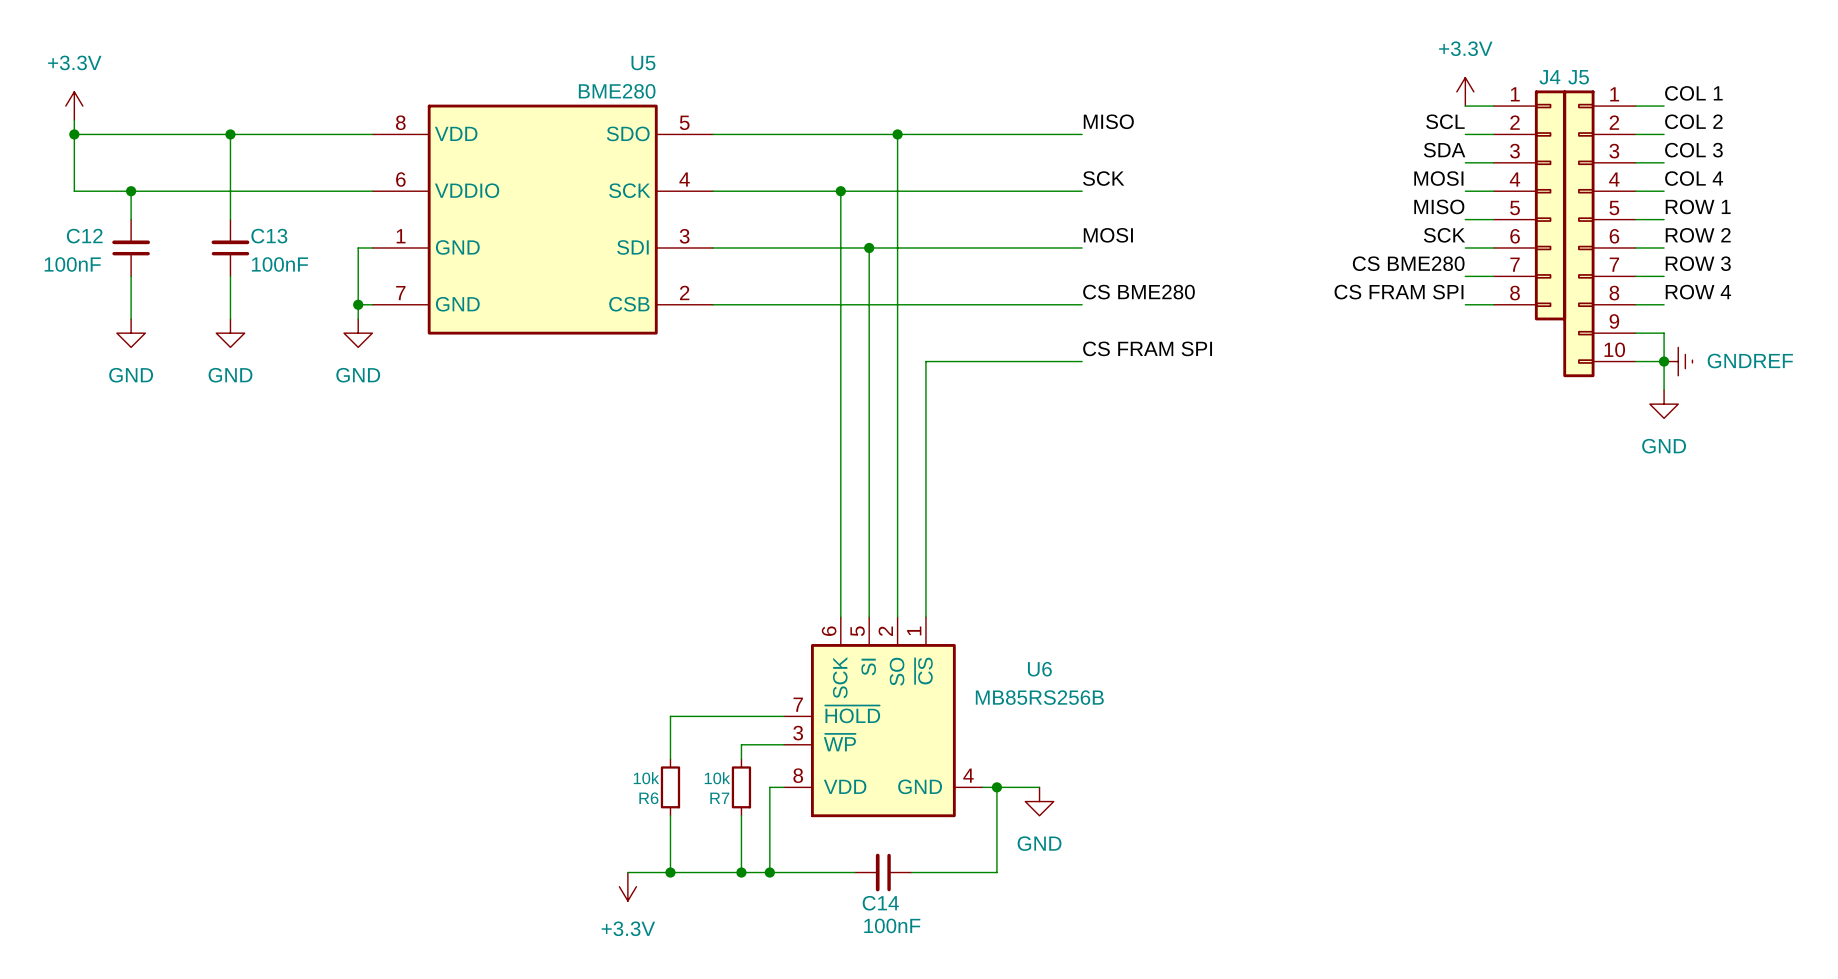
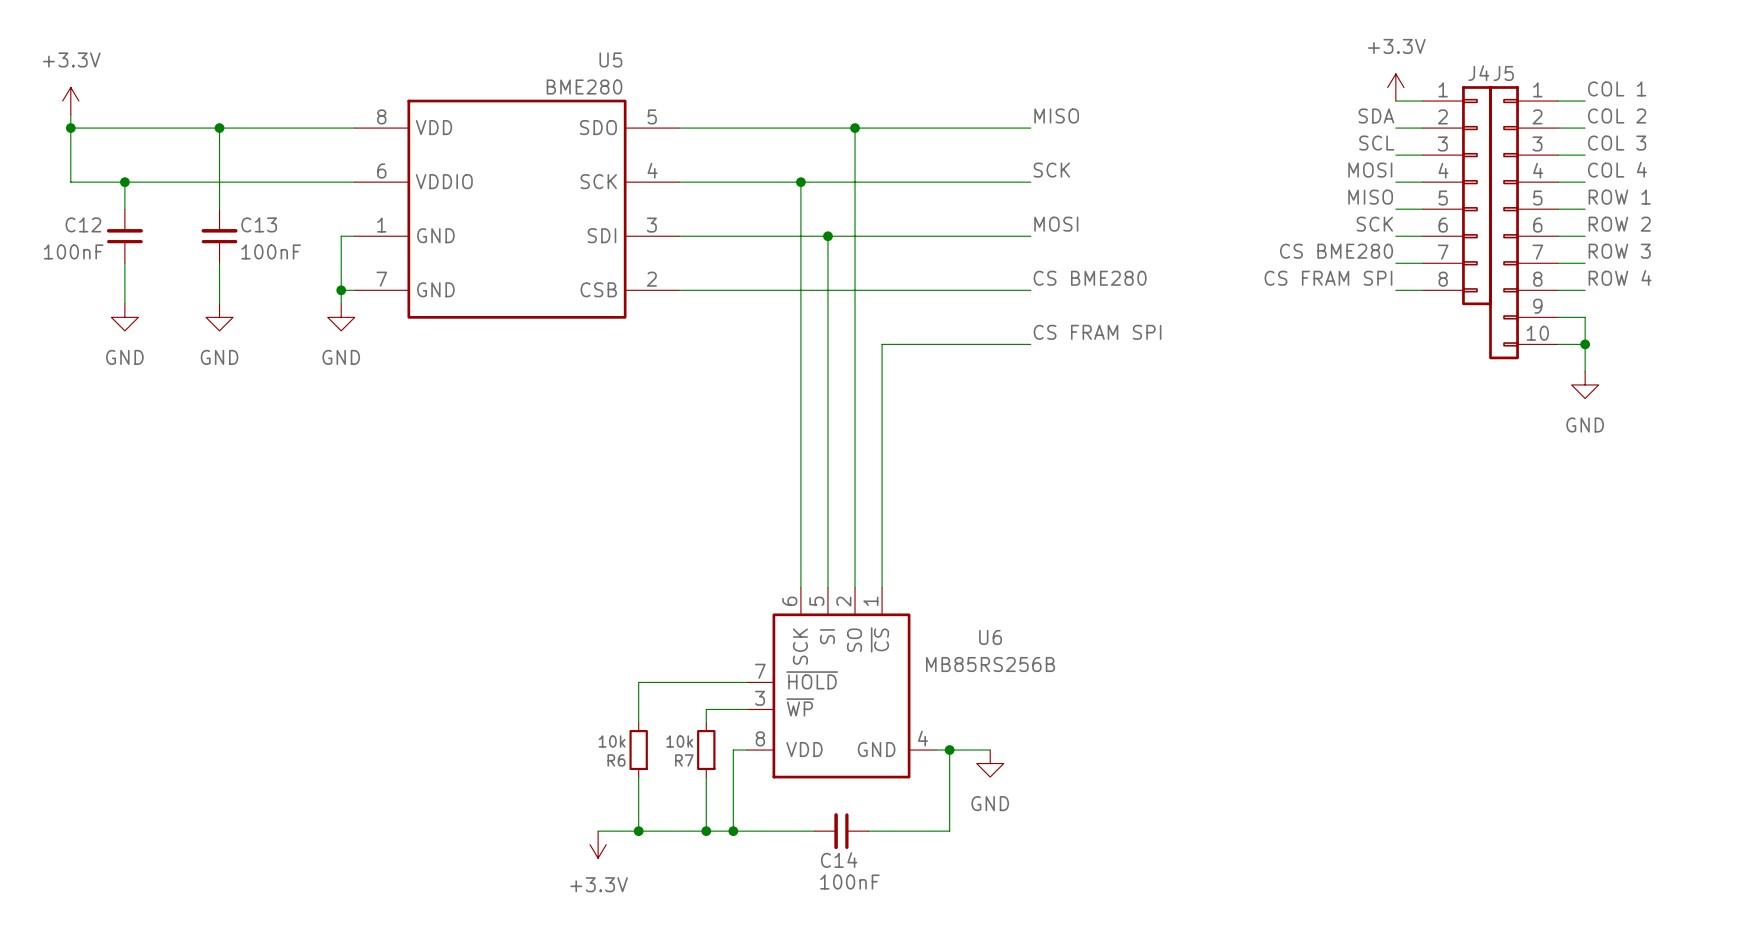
label: SCL (1445, 121) -> SDA (1376, 116)
label: SDA (1444, 150) -> SCL (1376, 143)
power symbol: GNDREF (1678, 361) -> none

